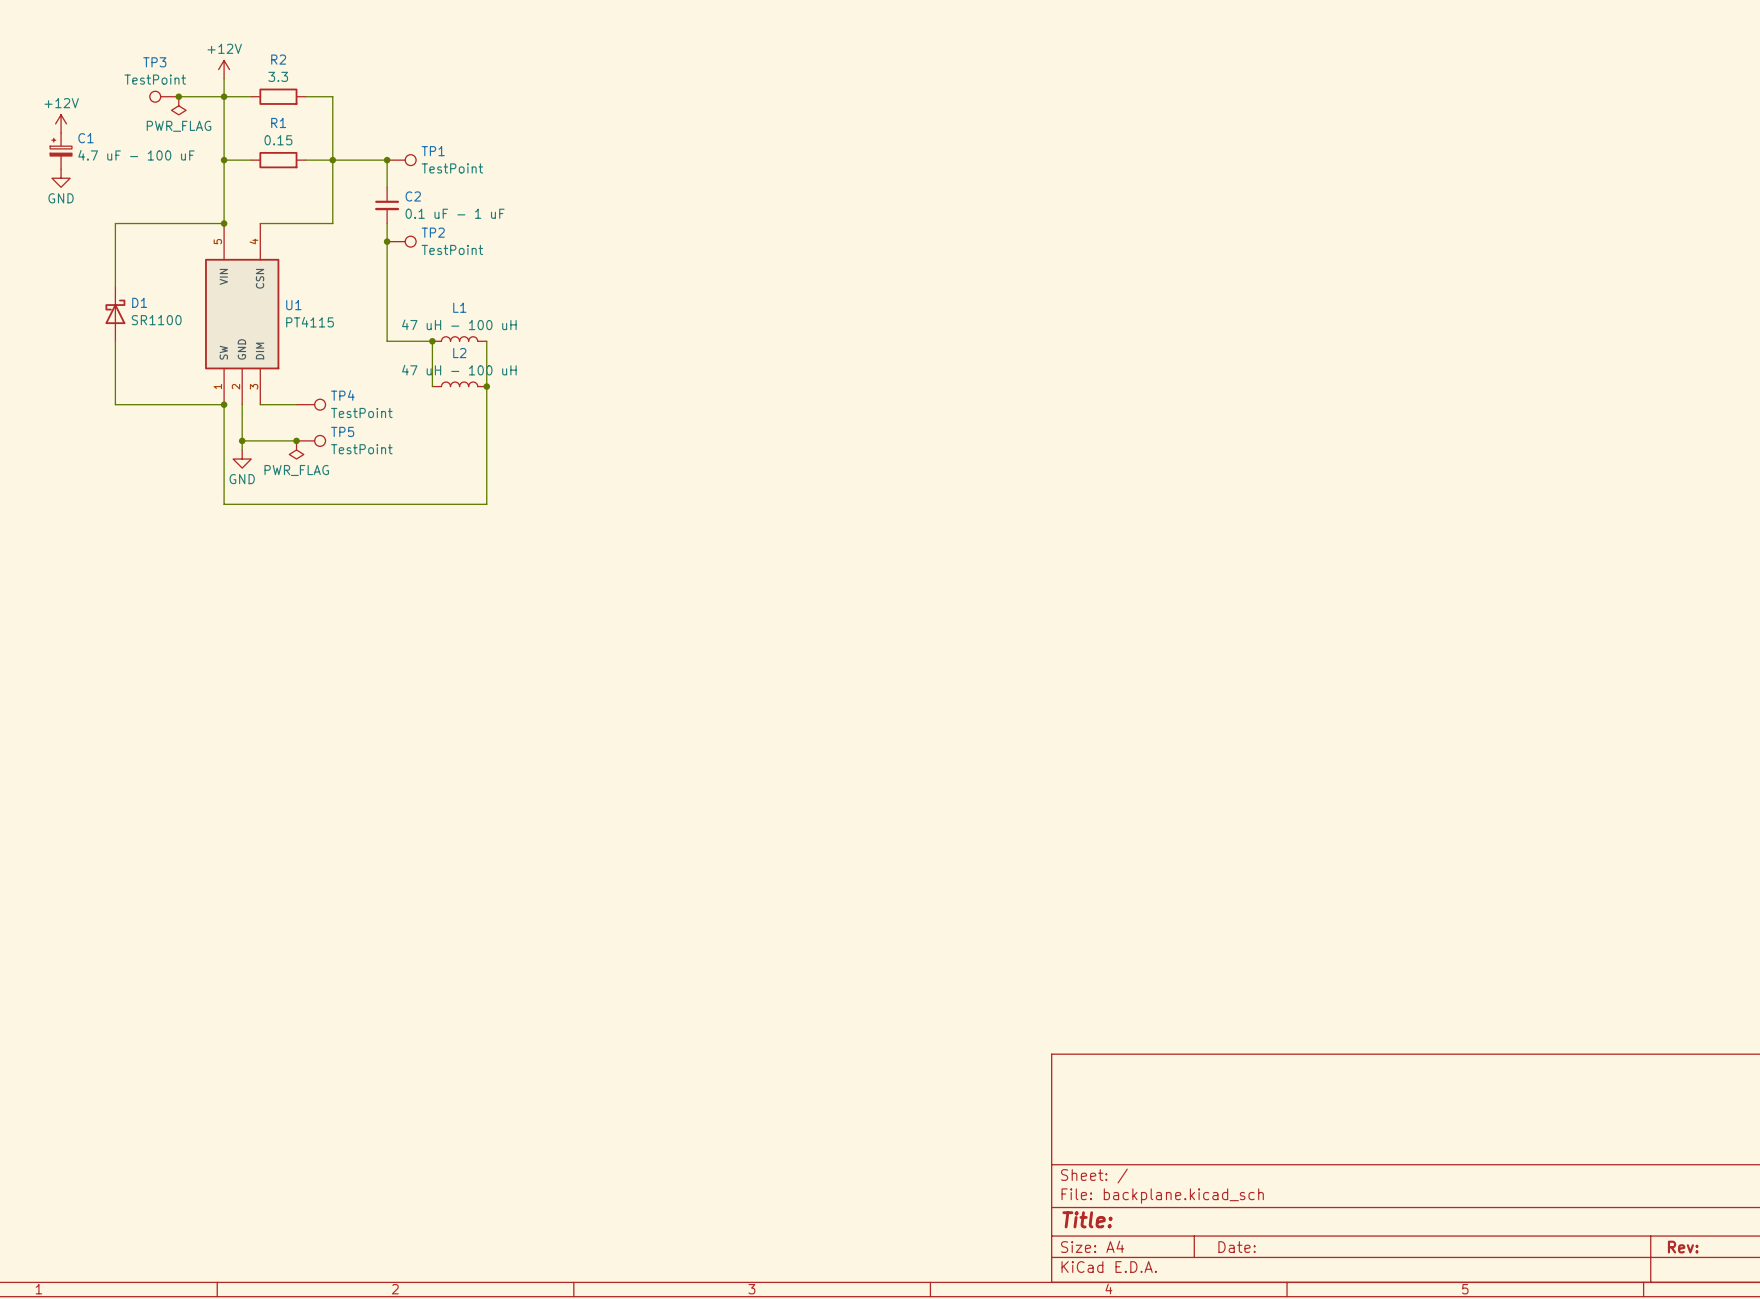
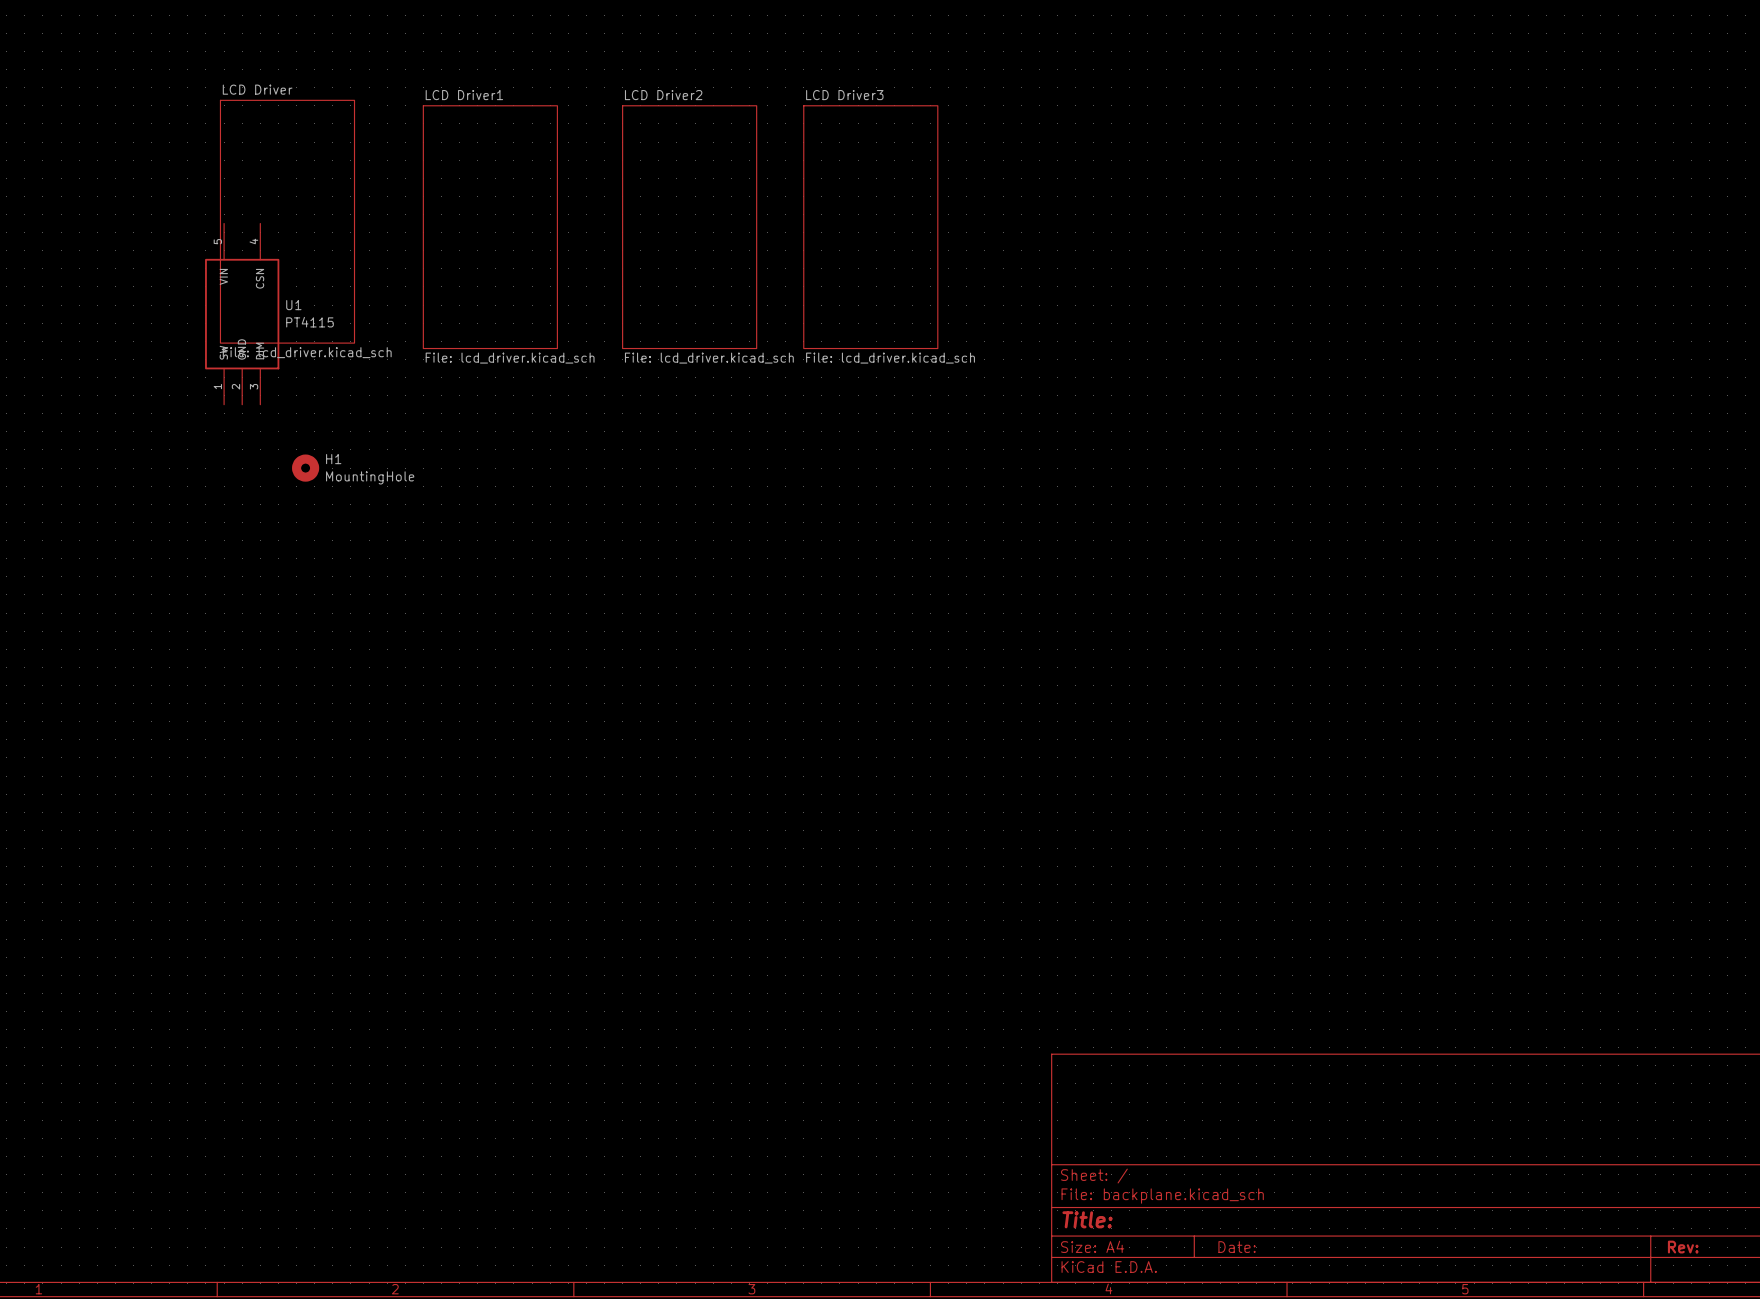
power symbol: +12V (224, 69) -> none
wire: (224, 78) (224, 223) (115, 223) (115, 286) -> none
TP3: TestPoint (164, 96) -> none
wire: (178, 96) (251, 96) -> none
junction: (178, 96) -> none
junction: (224, 96) -> none
R2: 3.3 (278, 96) -> none
wire: (305, 96) (332, 96) (332, 223) (260, 223) -> none
power symbol: PWR_FLAG (178, 105) -> none
power symbol: +12V (61, 123) -> none
C1: 4.7 uF - 100 uF (61, 151) -> none
wire: (224, 160) (251, 160) -> none
junction: (224, 160) -> none
R1: 0.15 (278, 160) -> none
wire: (305, 160) (387, 160) (387, 187) -> none
junction: (332, 160) -> none
junction: (387, 160) -> none
TP1: TestPoint (401, 160) -> none
power symbol: GND (61, 178) -> none
C2: 0.1 uF - 1 uF (387, 205) -> none
sheet LCD Driver: none -> File: lcd_driver.kicad_sch (287, 221)
junction: (224, 223) -> none
wire: (387, 223) (387, 341) (432, 341) (432, 386) -> none
sheet LCD Driver1: none -> File: lcd_driver.kicad_sch (490, 227)
sheet LCD Driver2: none -> File: lcd_driver.kicad_sch (689, 227)
sheet LCD Driver3: none -> File: lcd_driver.kicad_sch (870, 227)
junction: (387, 241) -> none
TP2: TestPoint (401, 241) -> none
D1: SR1100 (115, 314) -> none
L1: 47 uH - 100 uH (459, 339) -> none
wire: (115, 341) (115, 404) (224, 404) (224, 504) (486, 504) (486, 341) -> none
junction: (432, 341) -> none
L2: 47 uH - 100 uH (459, 384) -> none
junction: (486, 386) -> none
junction: (224, 404) -> none
wire: (242, 404) (242, 449) -> none
wire: (260, 404) (296, 404) -> none
TP4: TestPoint (311, 404) -> none
wire: (242, 440) (296, 440) -> none
junction: (242, 440) -> none
junction: (296, 440) -> none
TP5: TestPoint (311, 440) -> none
power symbol: PWR_FLAG (296, 449) -> none
power symbol: GND (242, 459) -> none
H1: none -> MountingHole (305, 468)

